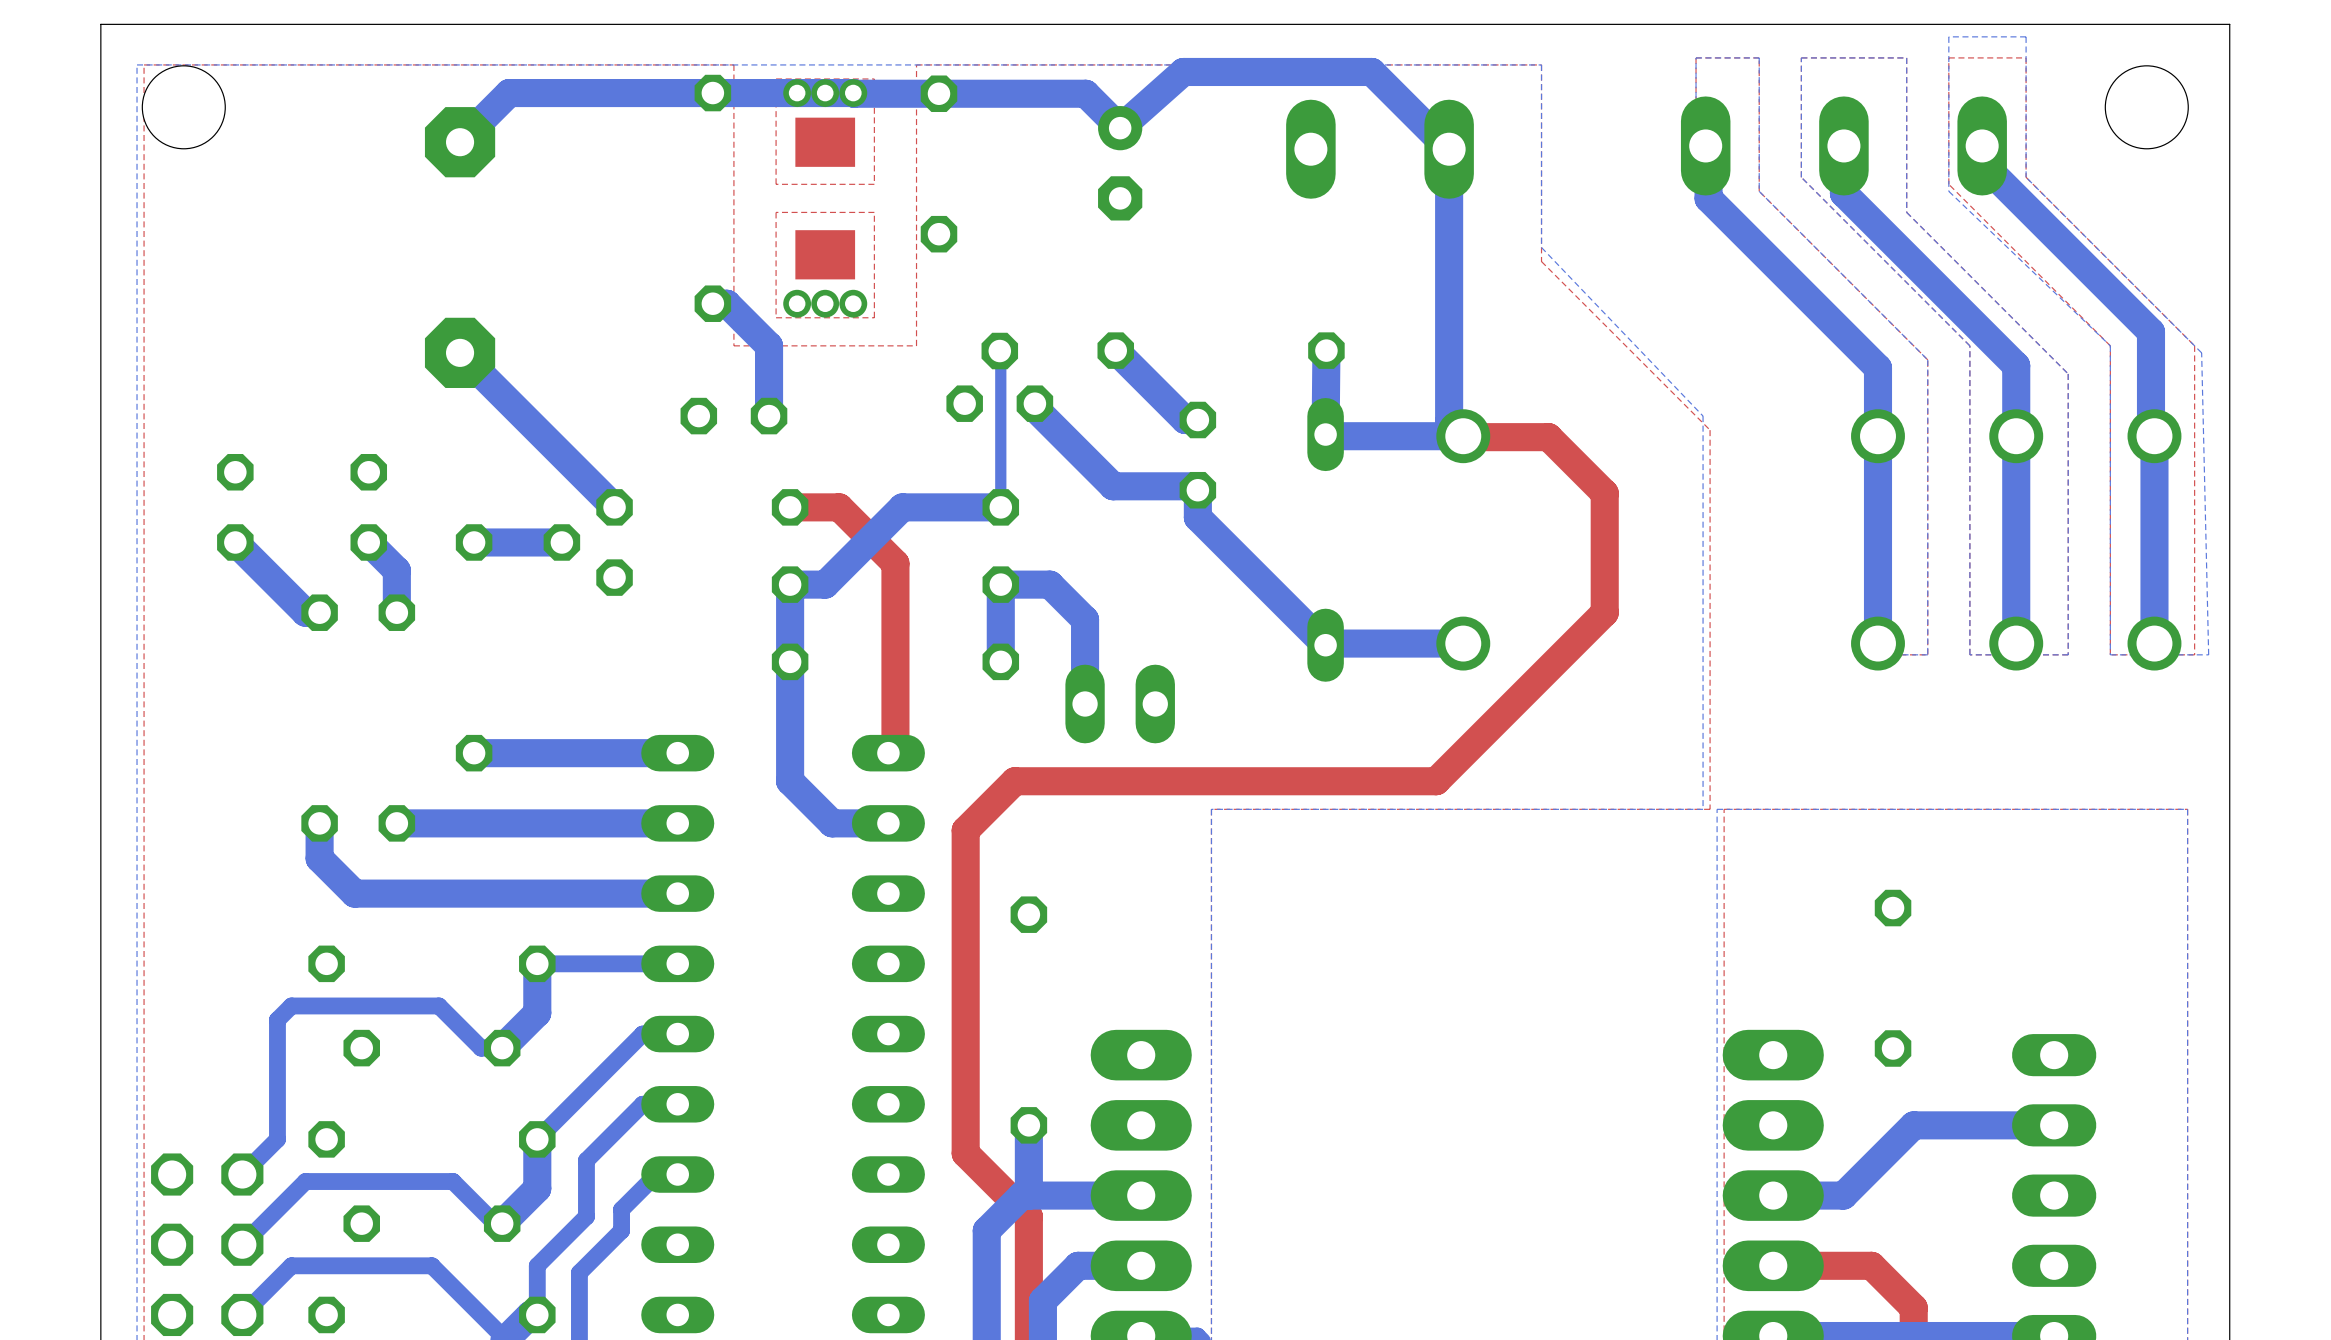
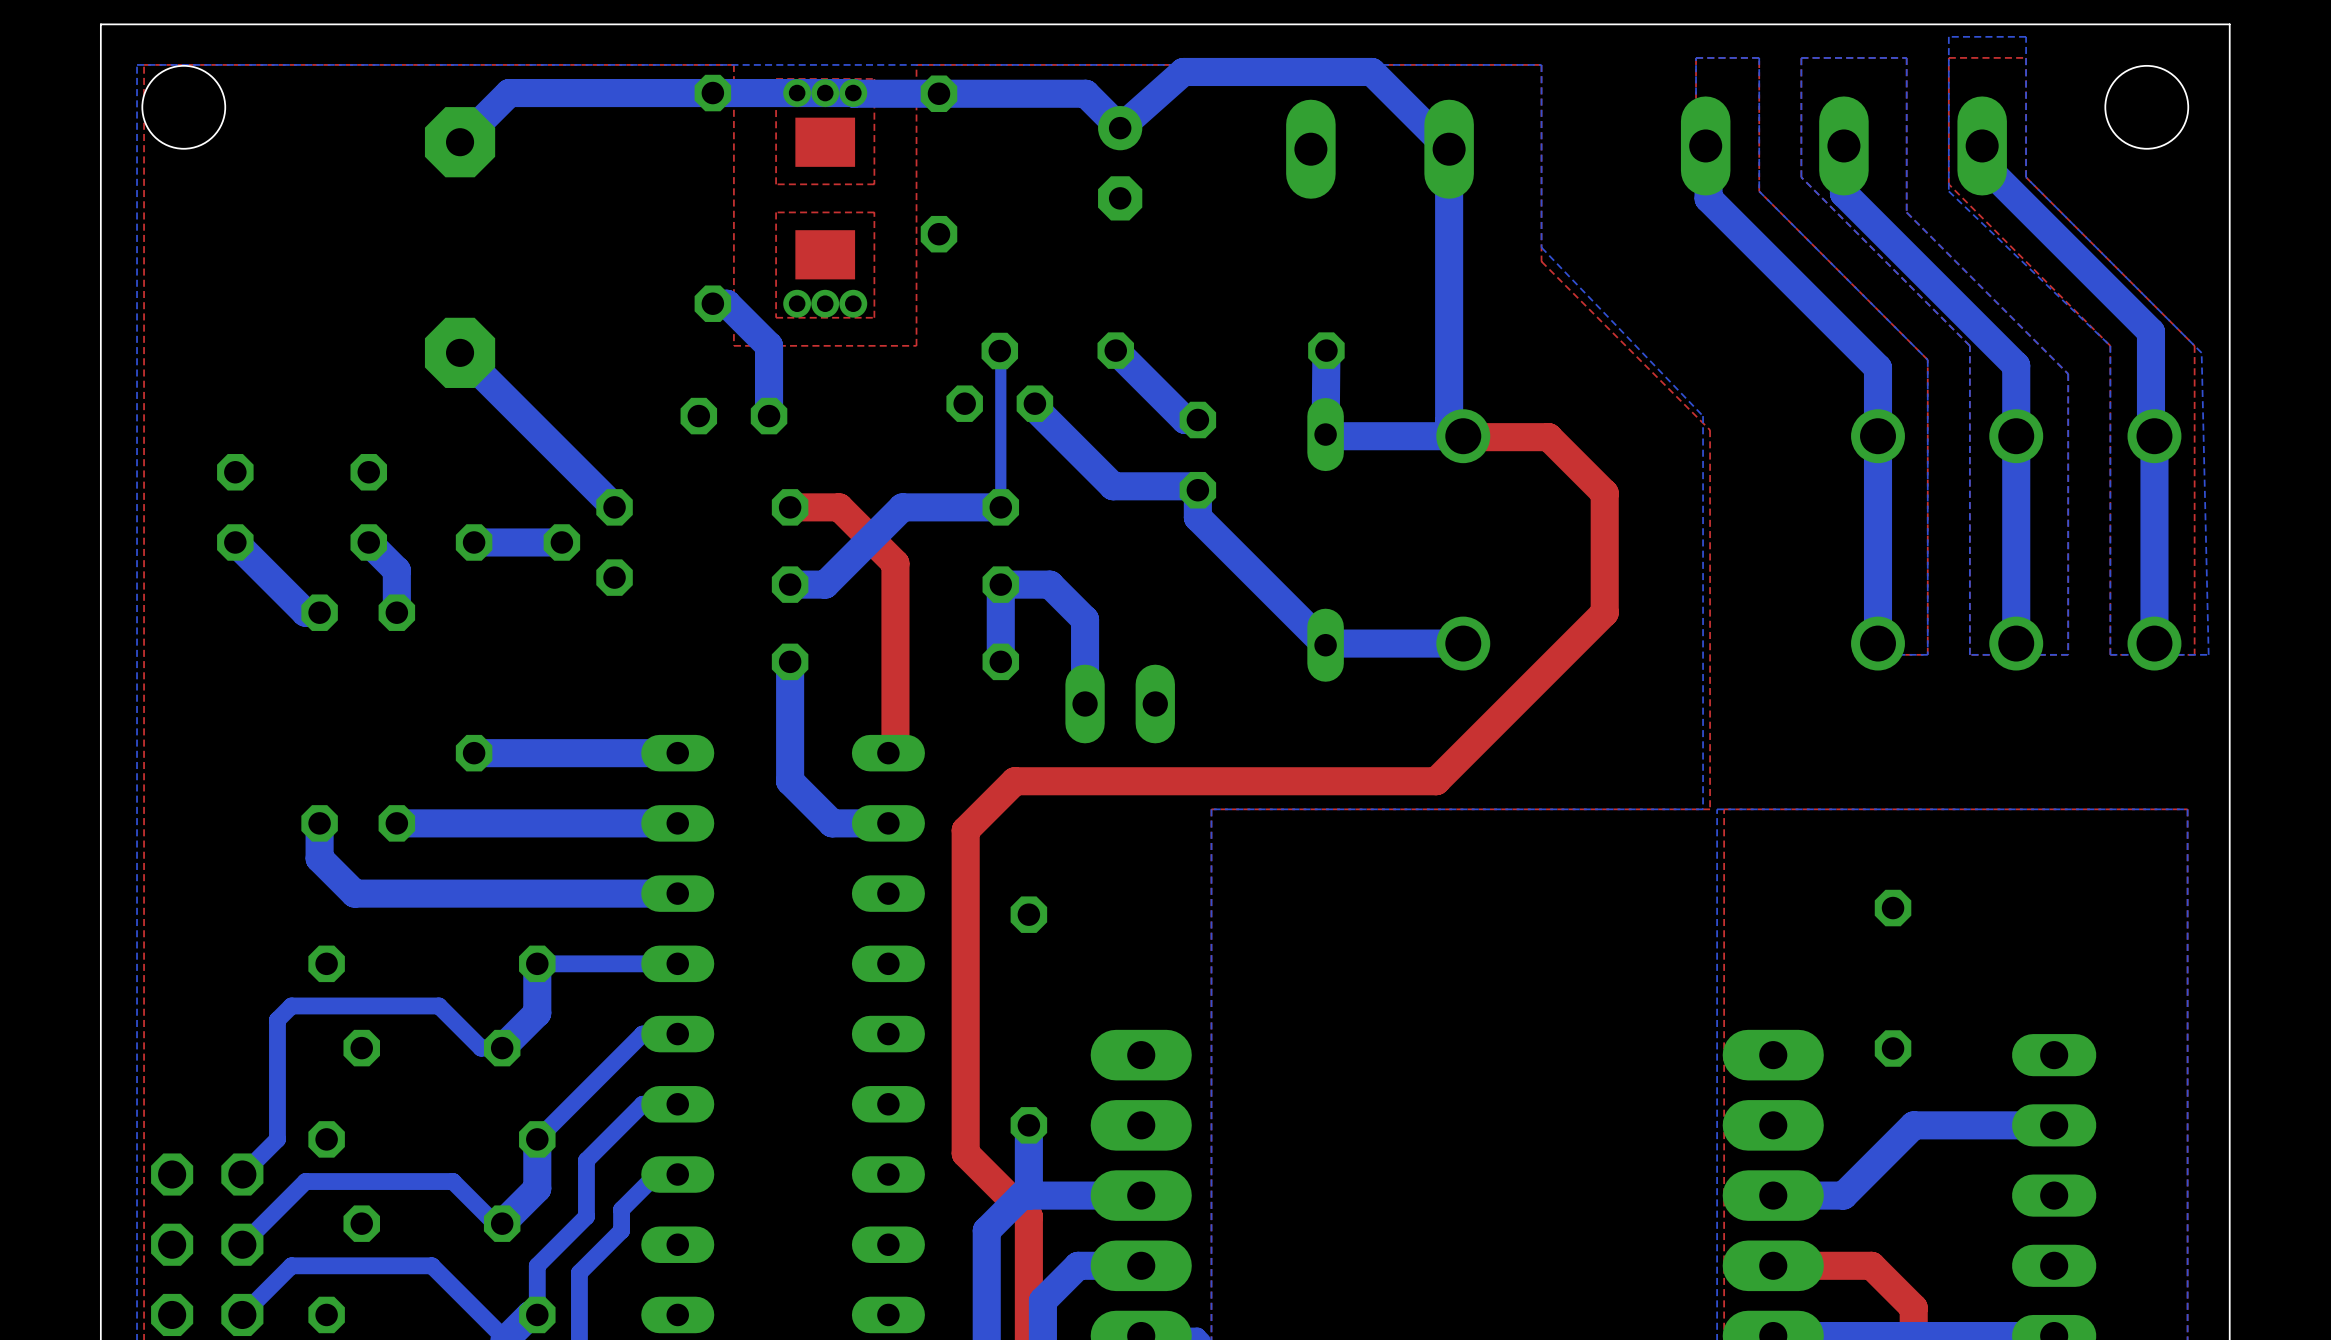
bottom track: (790, 584) (790, 661) -> none

